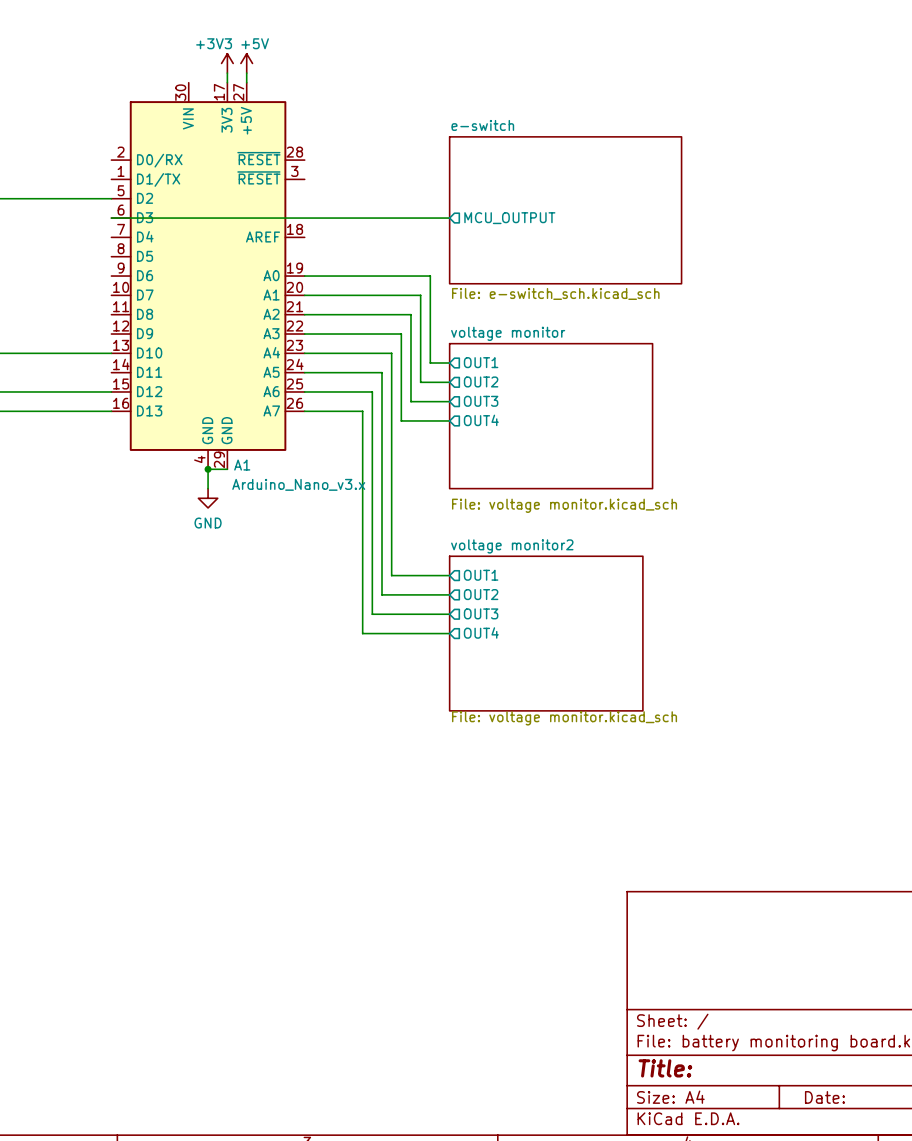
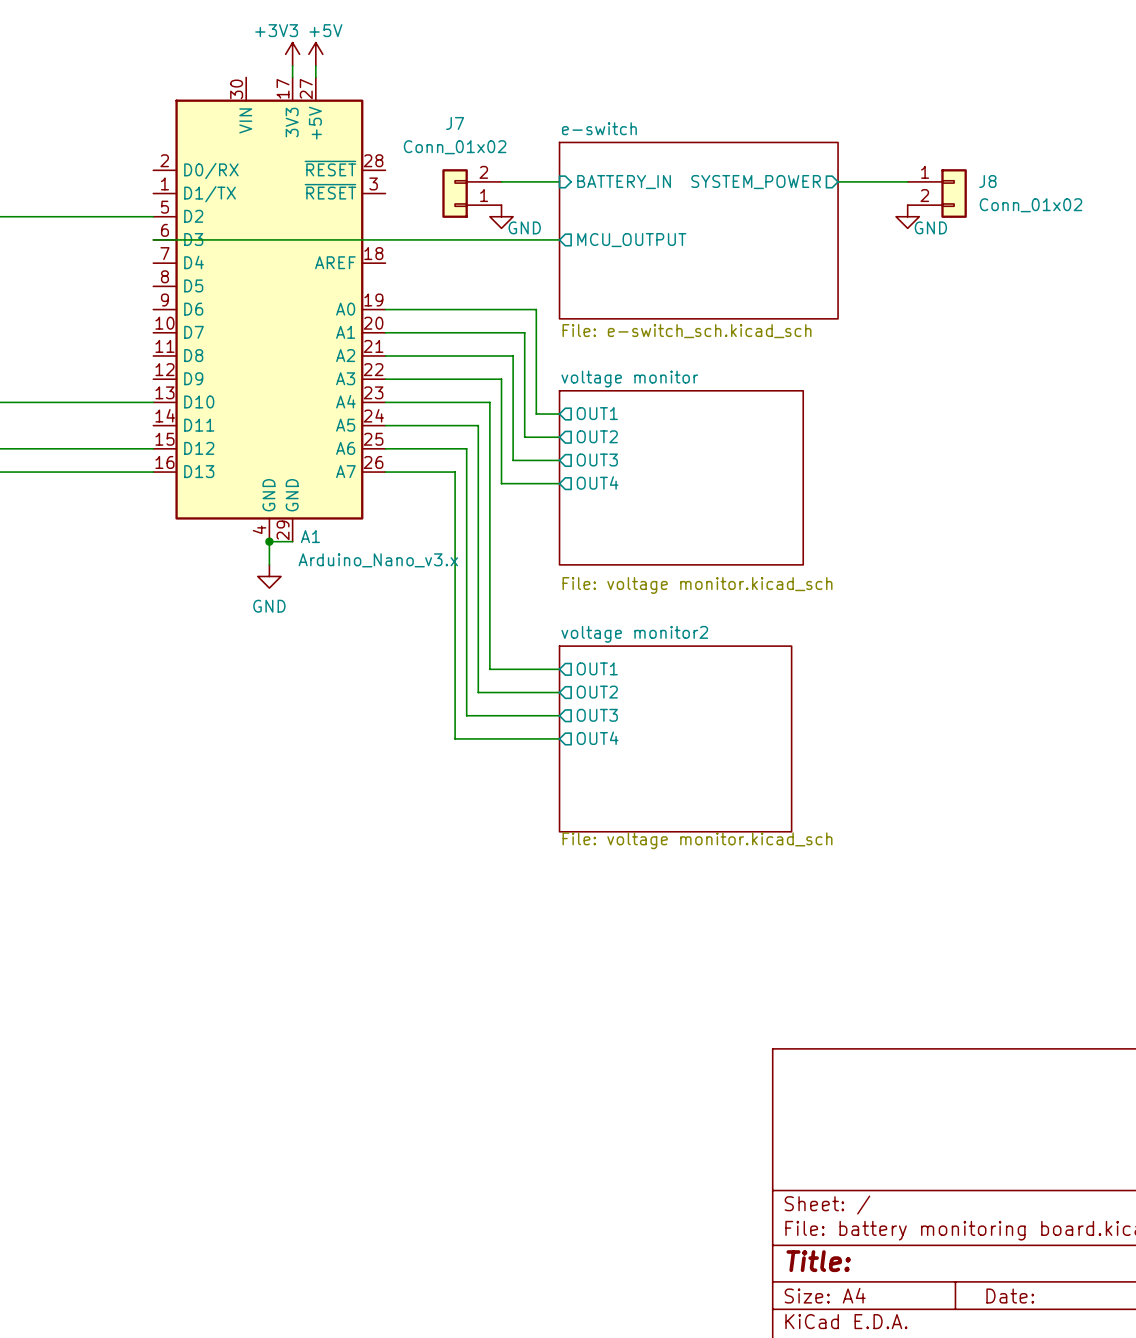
wire: none -> (501, 181) (559, 181)
sheet pin: none -> BATTERY_IN (624, 182)
sheet pin: none -> SYSTEM_POWER (756, 182)
wire: none -> (838, 181) (907, 181)
J7: none -> Conn_01x02 (471, 193)
J8: none -> Conn_01x02 (937, 193)
power symbol: none -> GND (501, 216)
power symbol: none -> GND (907, 216)

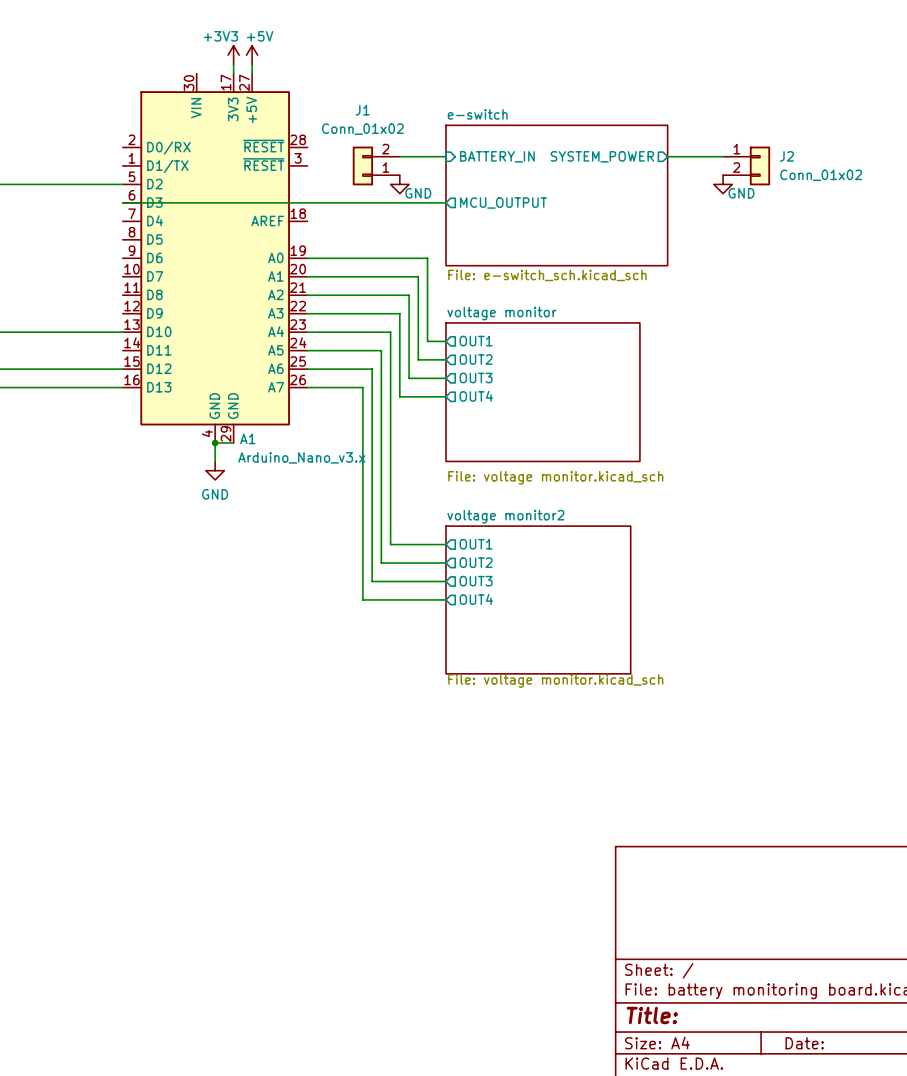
J7 name: J7 (455, 123) -> J1 (362, 110)
J8 name: J8 (987, 181) -> J2 (786, 156)

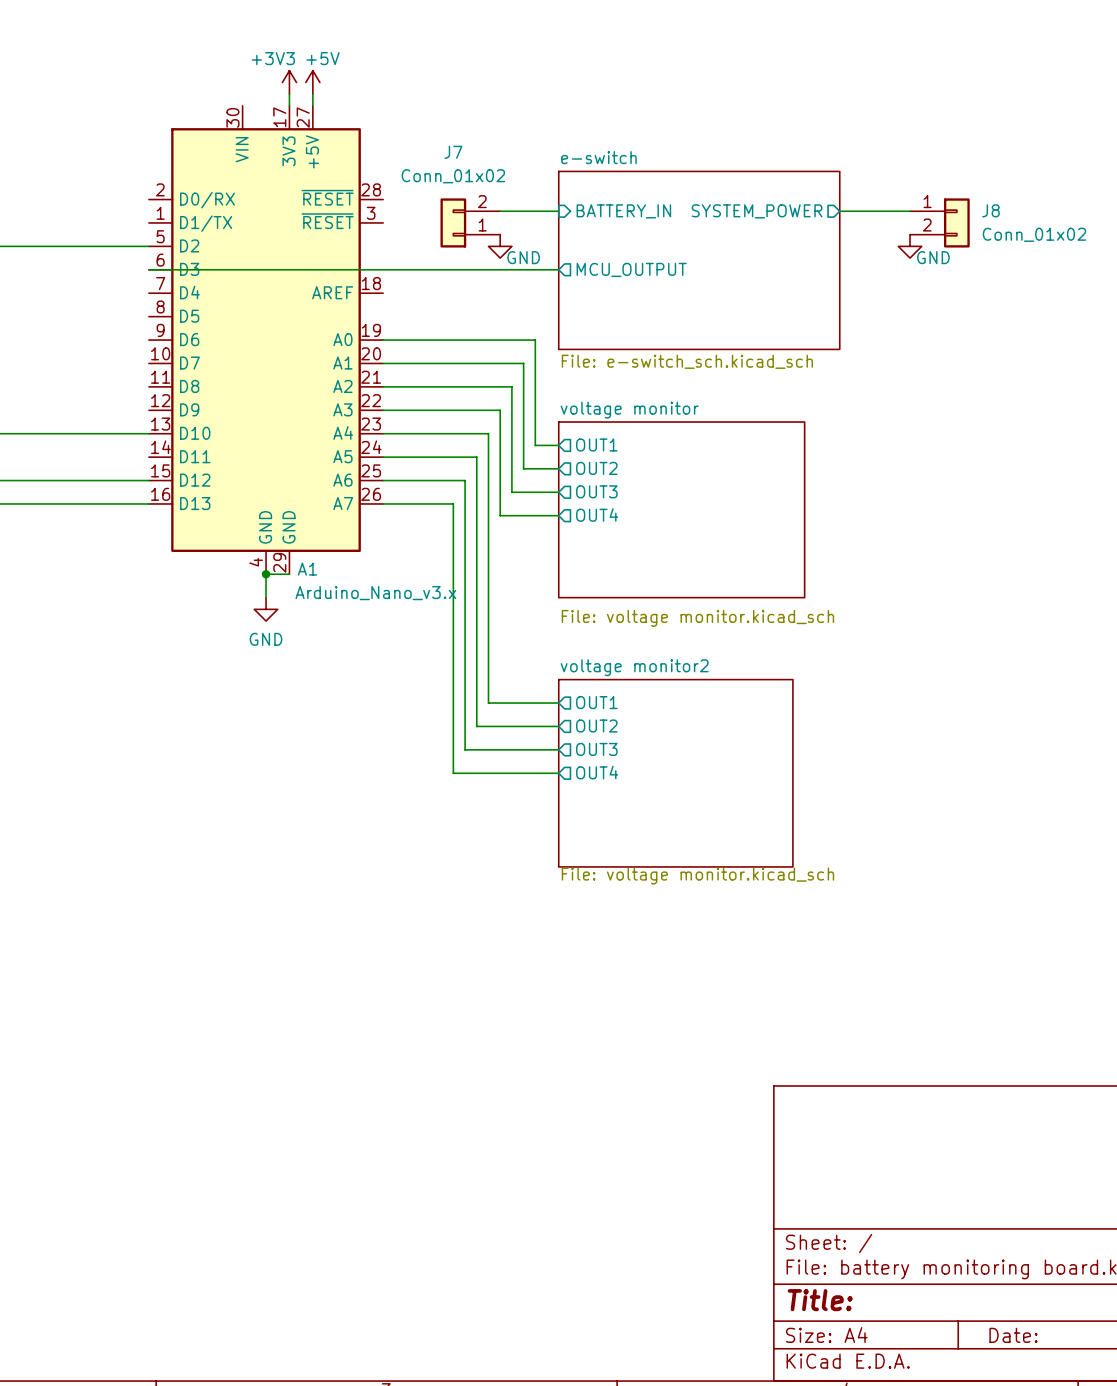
J1 name: J1 (362, 110) -> J7 (453, 152)
J2 name: J2 (786, 156) -> J8 (990, 210)

